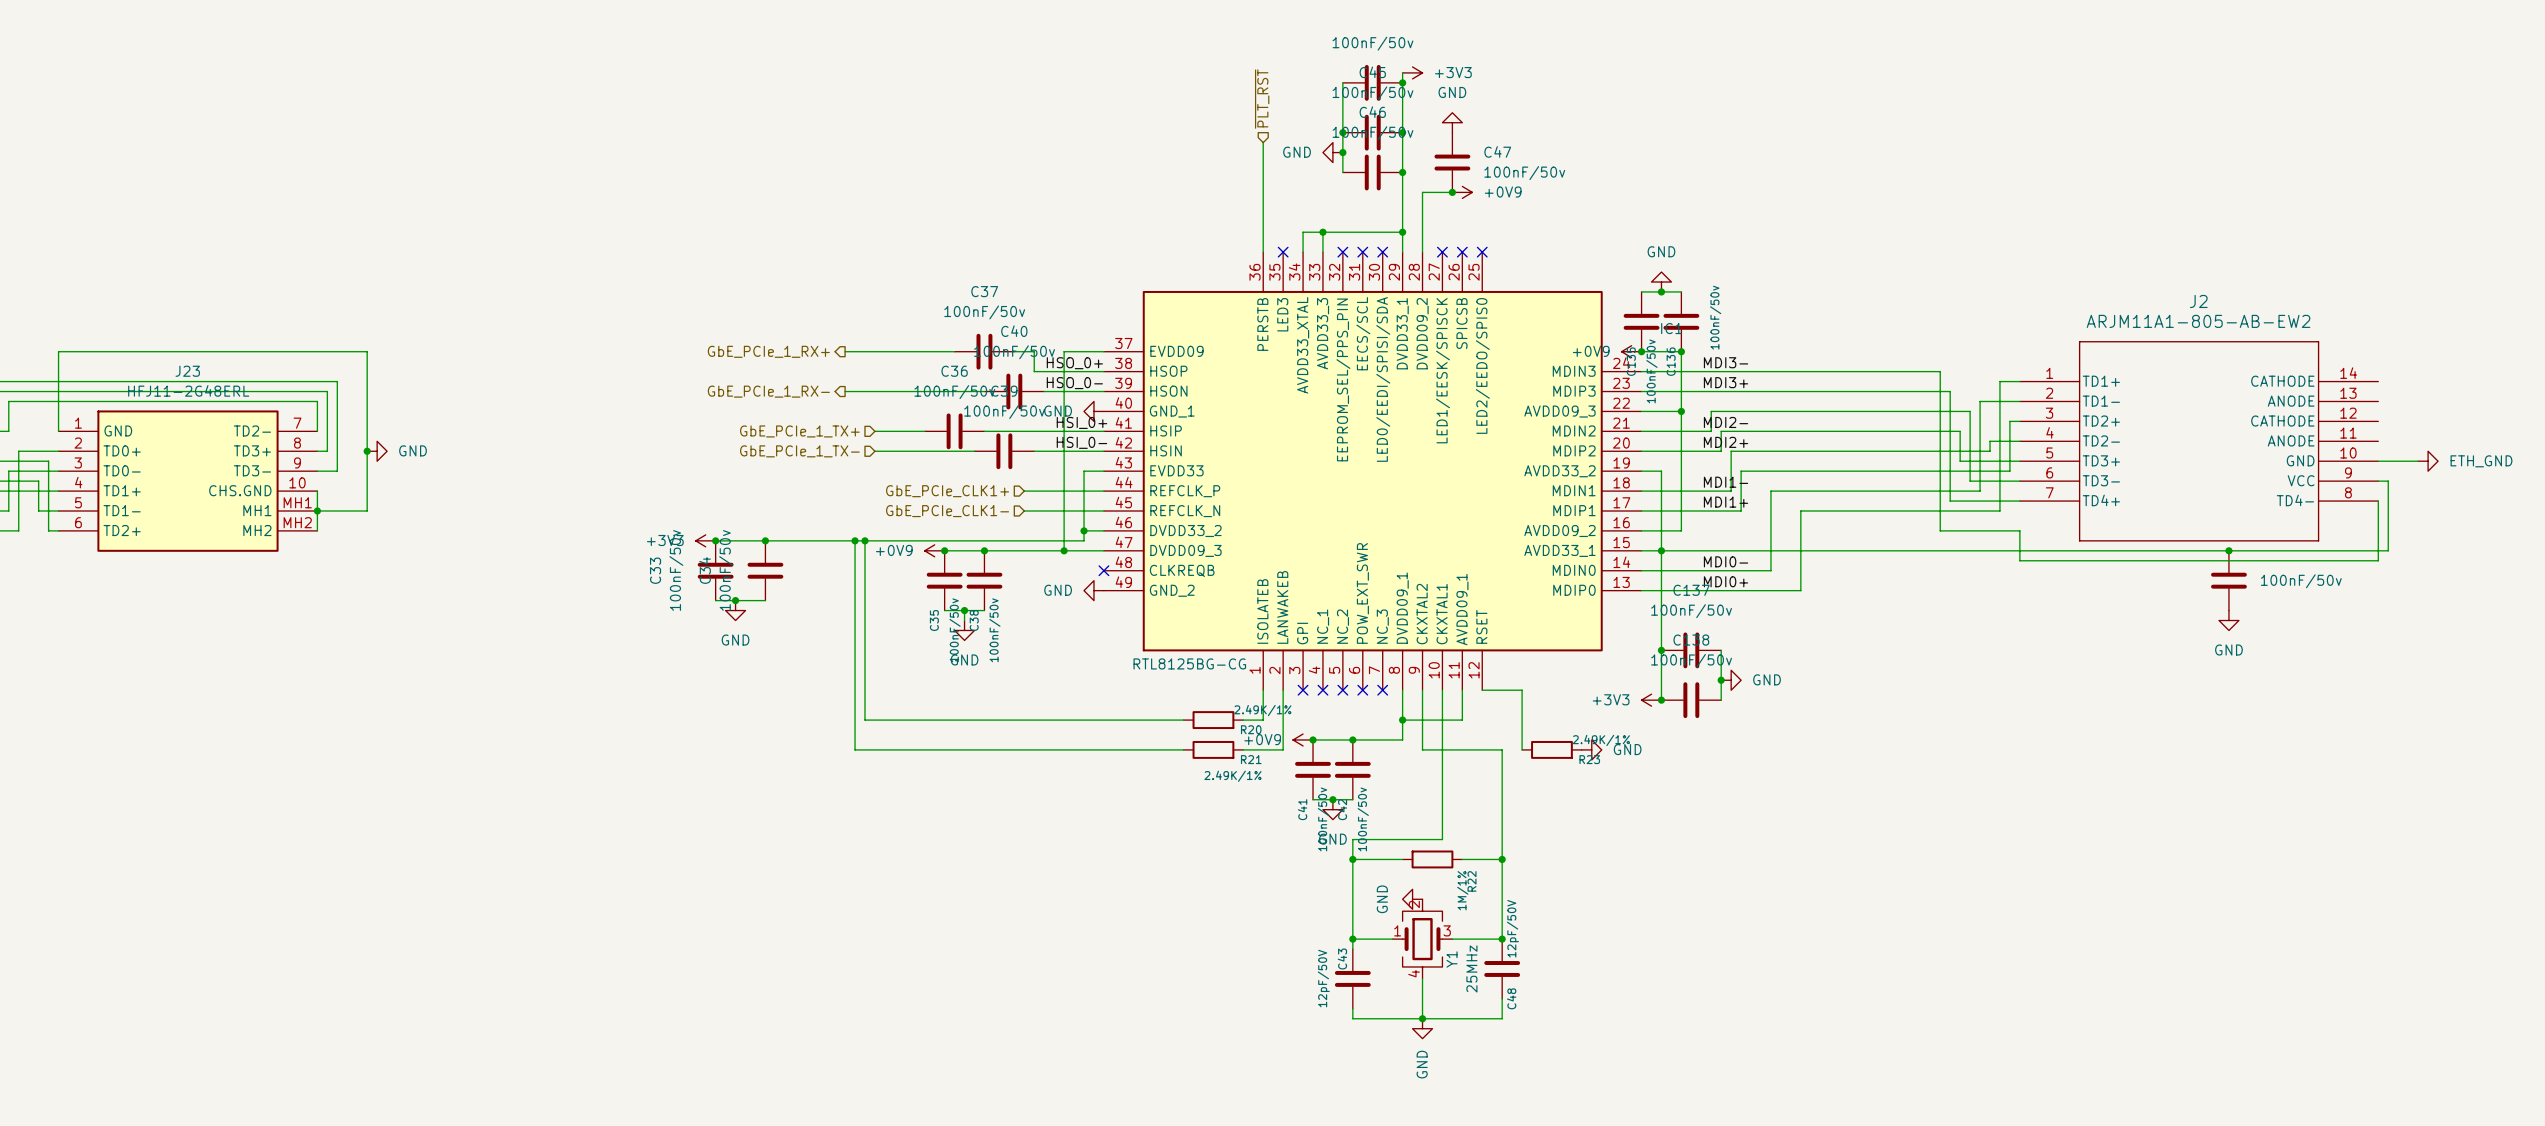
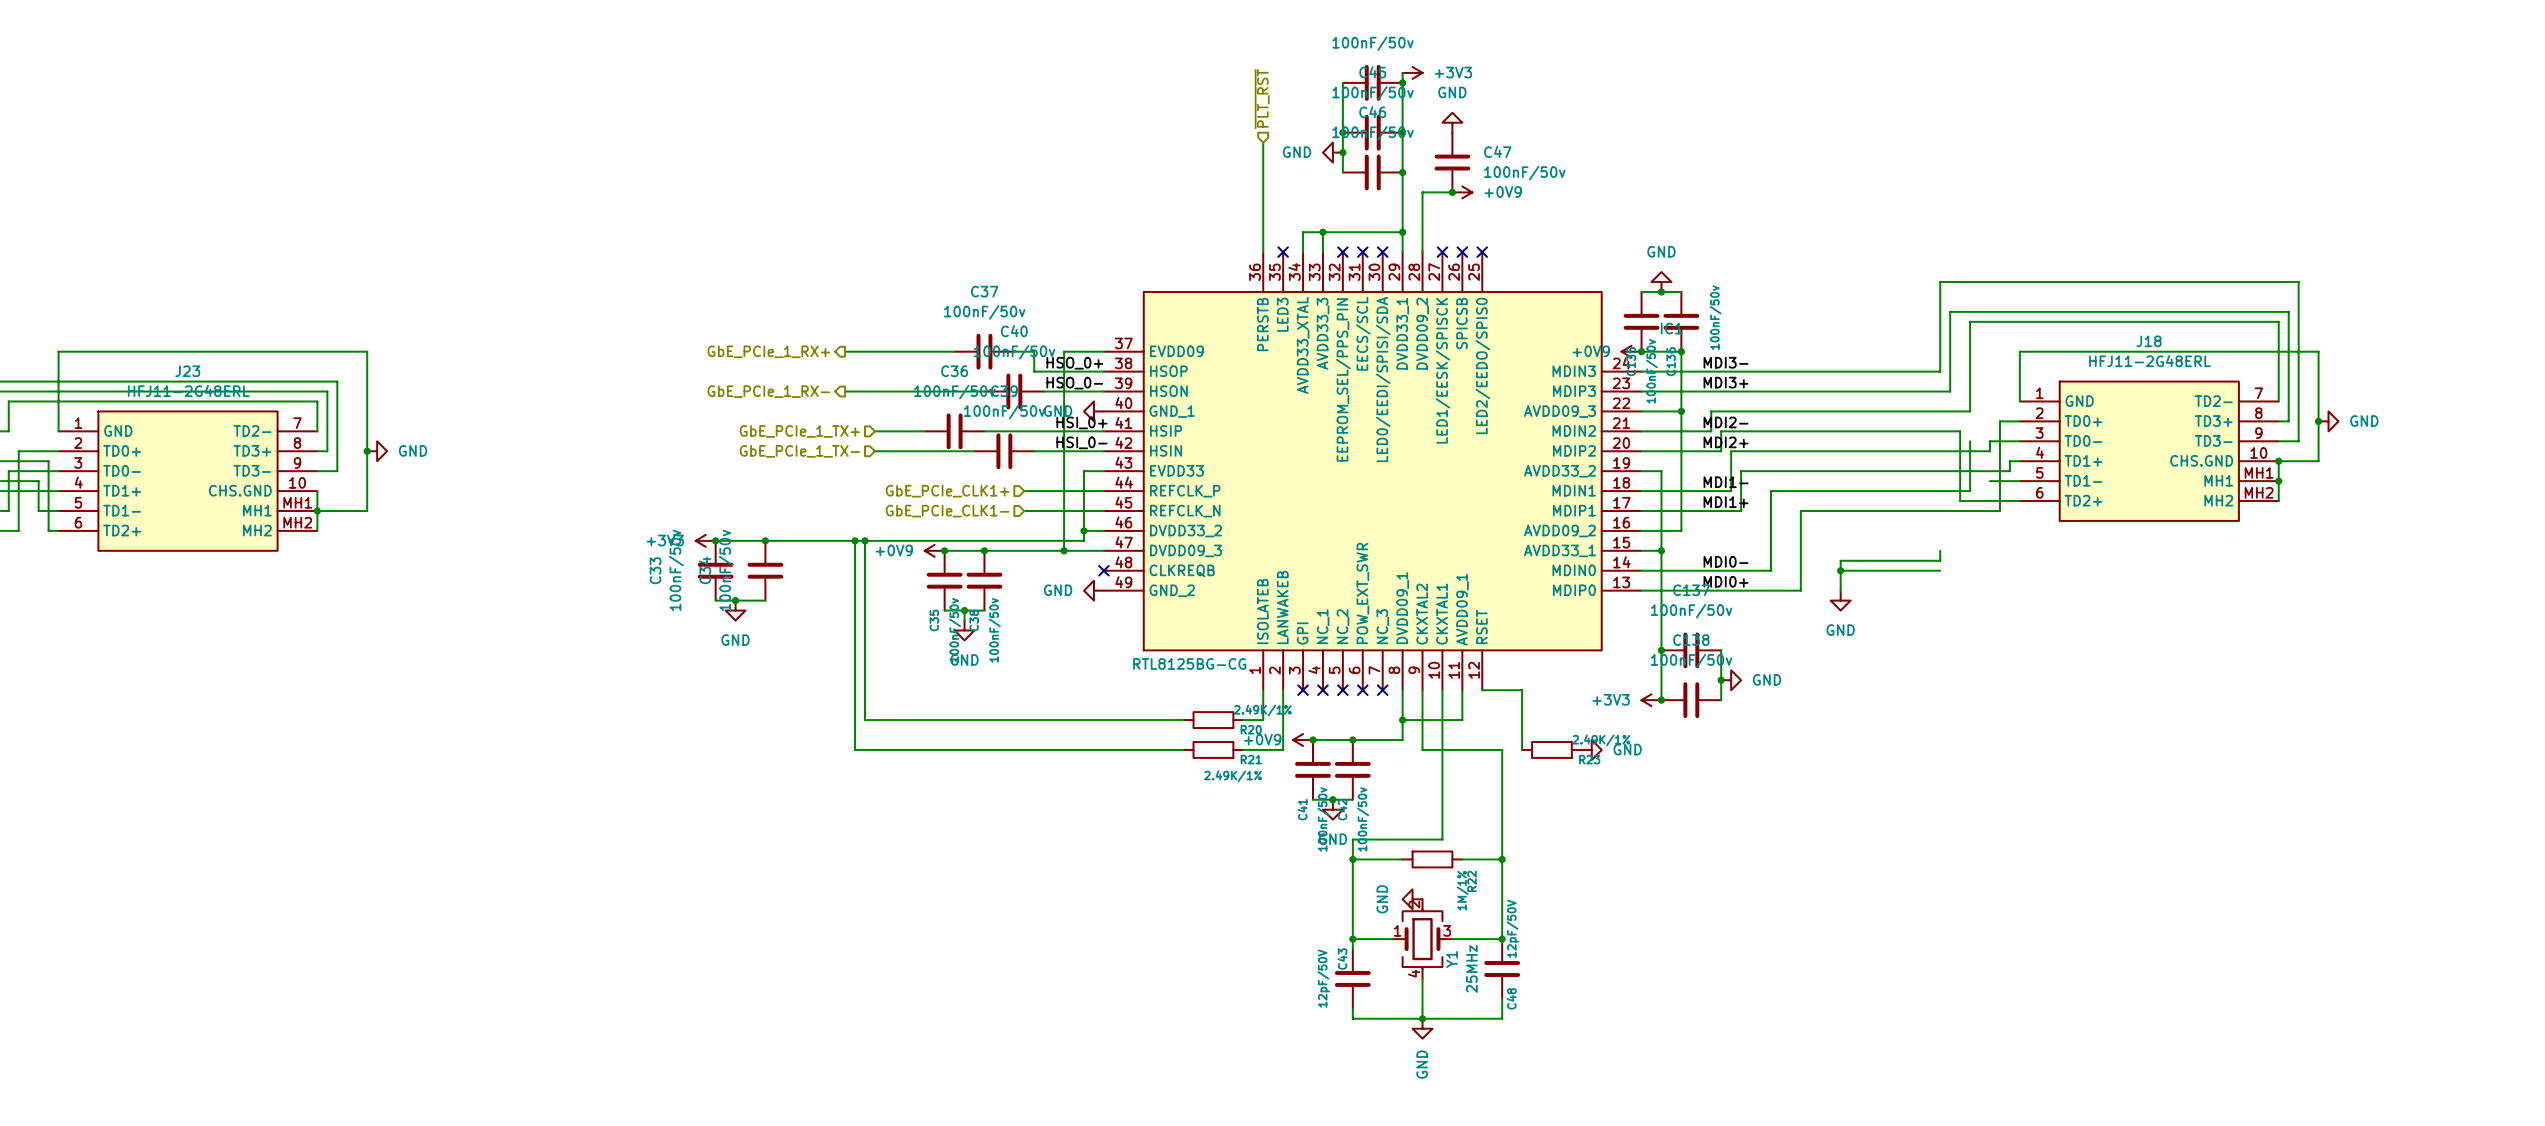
wire: (1940, 371) (1940, 530) (2019, 530) (2019, 560) (2378, 560) (2378, 501) -> (1940, 371) (1940, 282) (2298, 282) (2298, 441) (2278, 441)
wire: (2019, 381) (1999, 381) (1999, 421) -> (2009, 421) (1999, 421)
wire: (1950, 391) (1950, 501) (1960, 501) -> (1960, 461) (1960, 501)
wire: none -> (1950, 391) (1950, 311) (2288, 311) (2288, 421) (2278, 421)
wire: (2019, 401) (1980, 401) (1980, 491) (1970, 491) -> (2019, 401) (2019, 351) (2318, 351) (2318, 461) (2278, 461) (2278, 501)
wire: (1970, 411) (1970, 441) -> (1970, 411) (1970, 321) (2278, 321) (2278, 401)
wire: (2009, 421) (2009, 461) (1960, 461) -> none
junction: none -> (2318, 421)
power symbol: none -> GND (2328, 421)
J2: ARJM11A1-805-AB-EW2 (2199, 441) -> none
J18: none -> HFJ11-2G48ERL (2149, 451)
junction: none -> (2278, 461)
wire: (2378, 461) (2418, 461) -> none
power symbol: ETH_GND (2428, 461) -> none
wire: (1970, 481) (1990, 481) -> (1970, 481) (1970, 491)
junction: none -> (2278, 481)
wire: (2378, 481) (2388, 481) (2388, 550) (1661, 550) -> none
wire: none -> (1940, 550) (1940, 560) (1840, 560) (1840, 590)
junction: (2228, 550) -> none
wire: none -> (1840, 570) (1940, 570)
junction: none -> (1840, 570)
part: 100nF/50v (2228, 580) -> none
power symbol: none -> GND (1840, 600)
power symbol: GND (2228, 620) -> none

